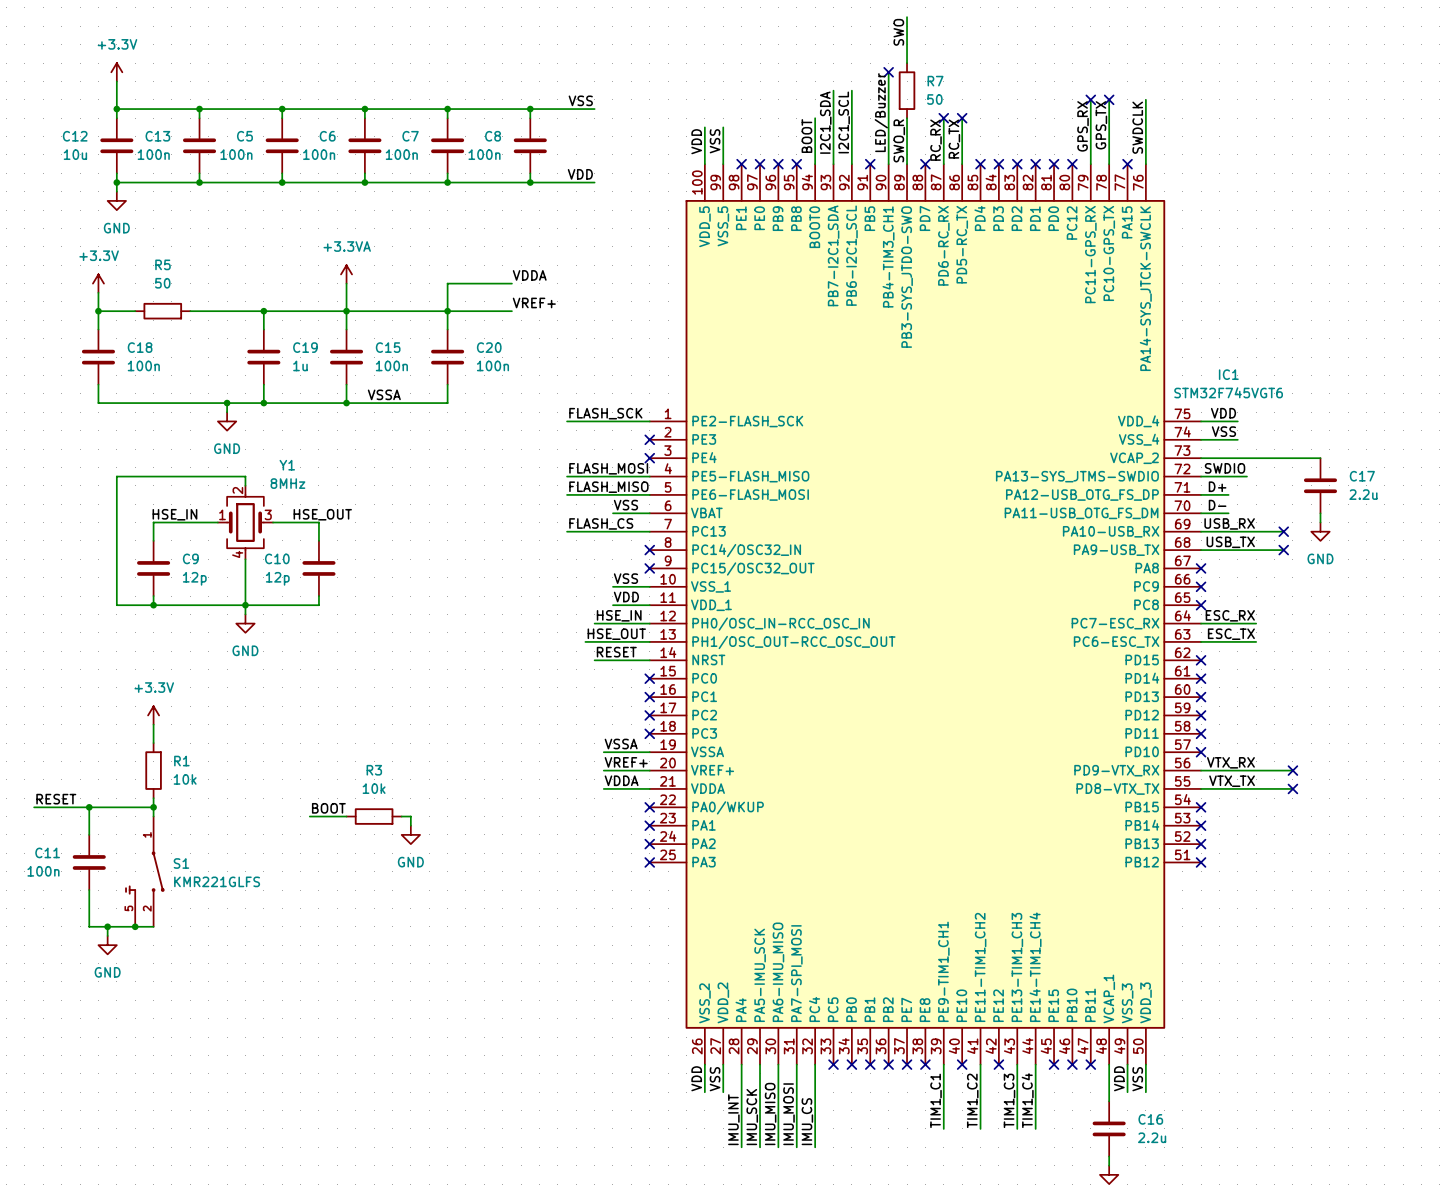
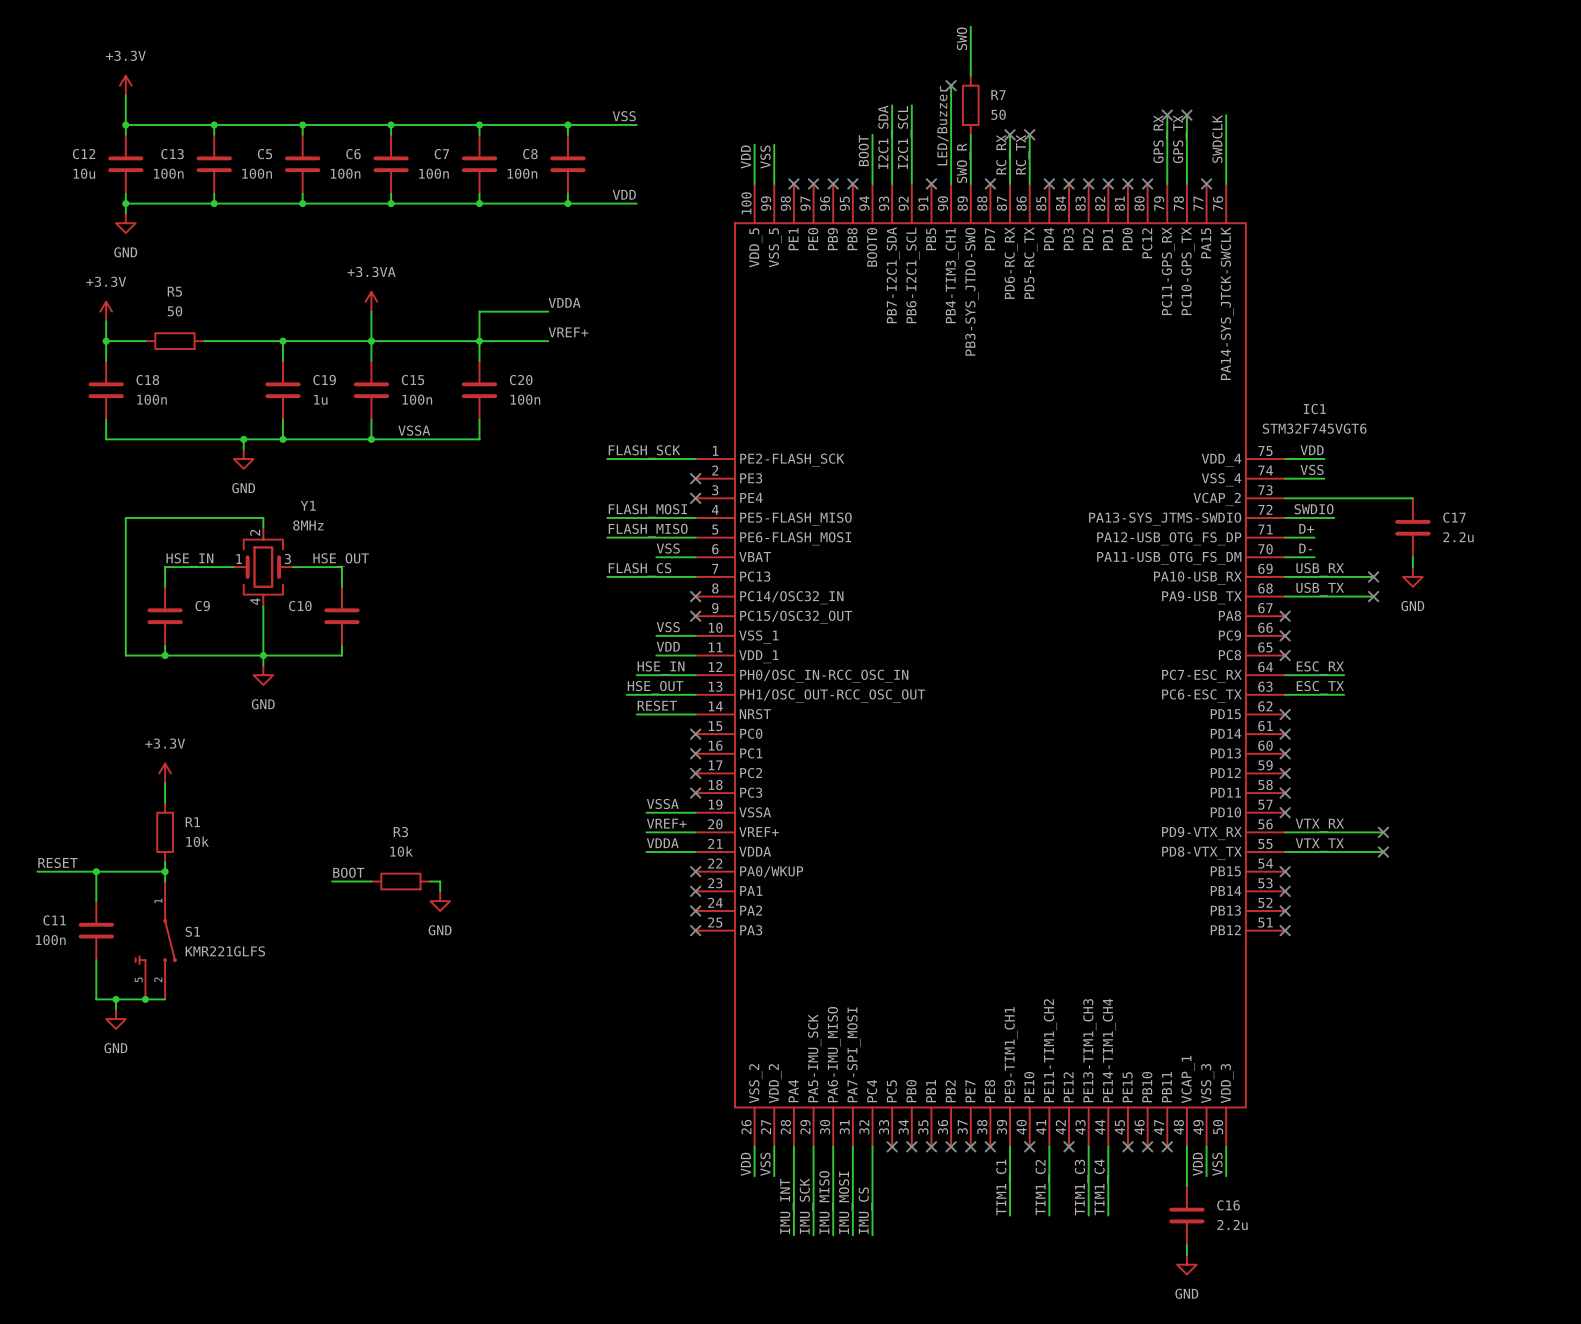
C9 value: 12p (194, 578) -> none
C10 value: 12p (277, 578) -> none

